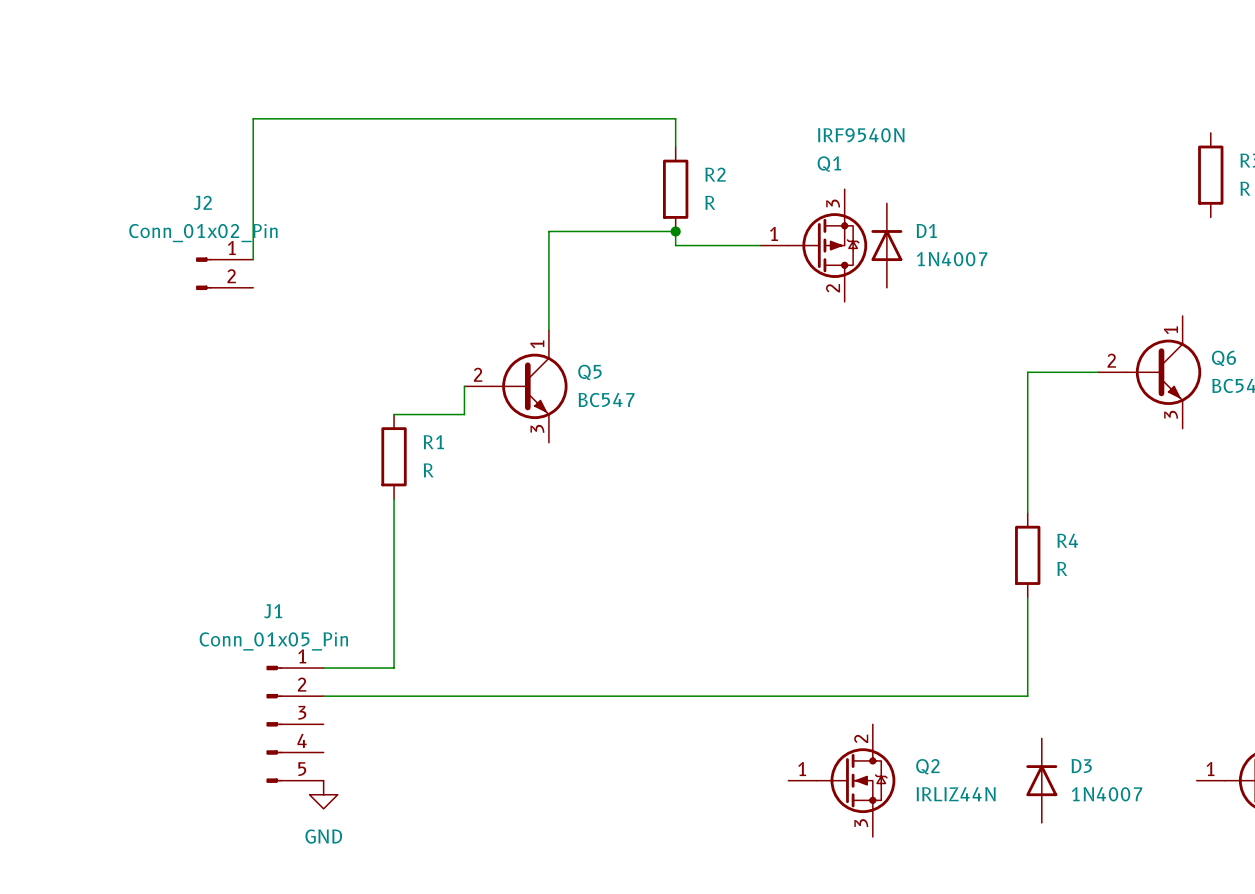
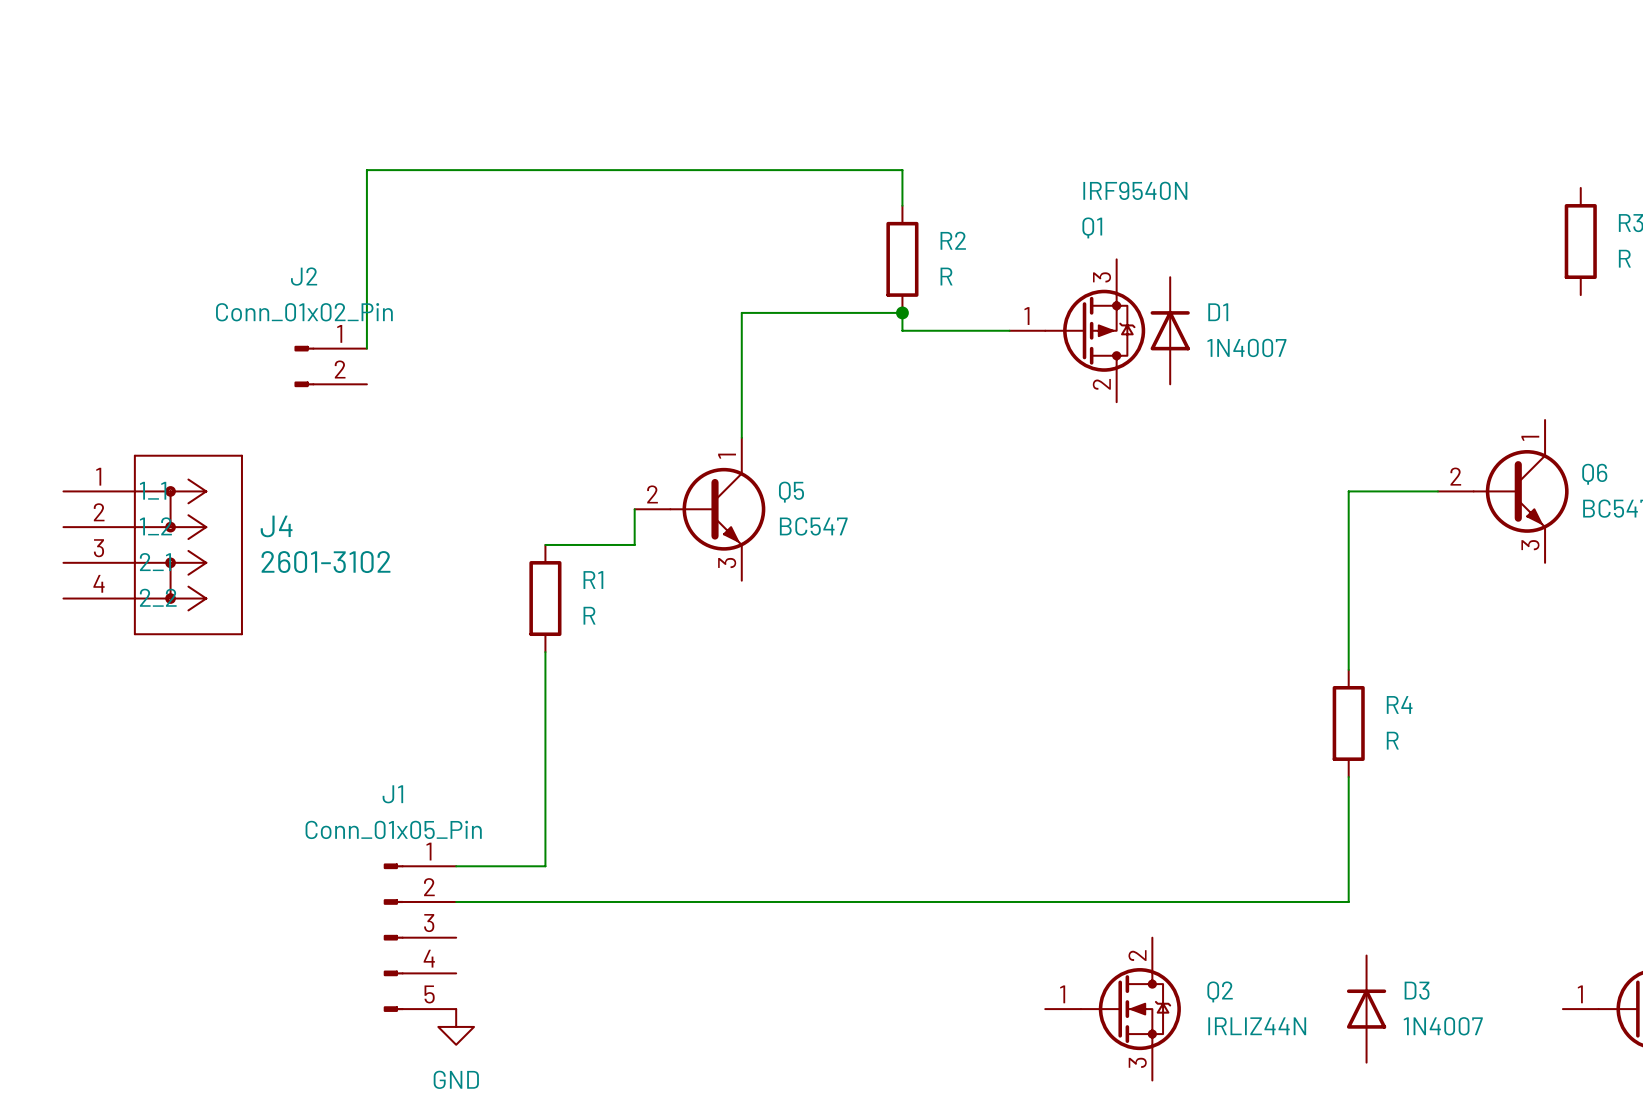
J4: none -> 2601-3102 (153, 544)

